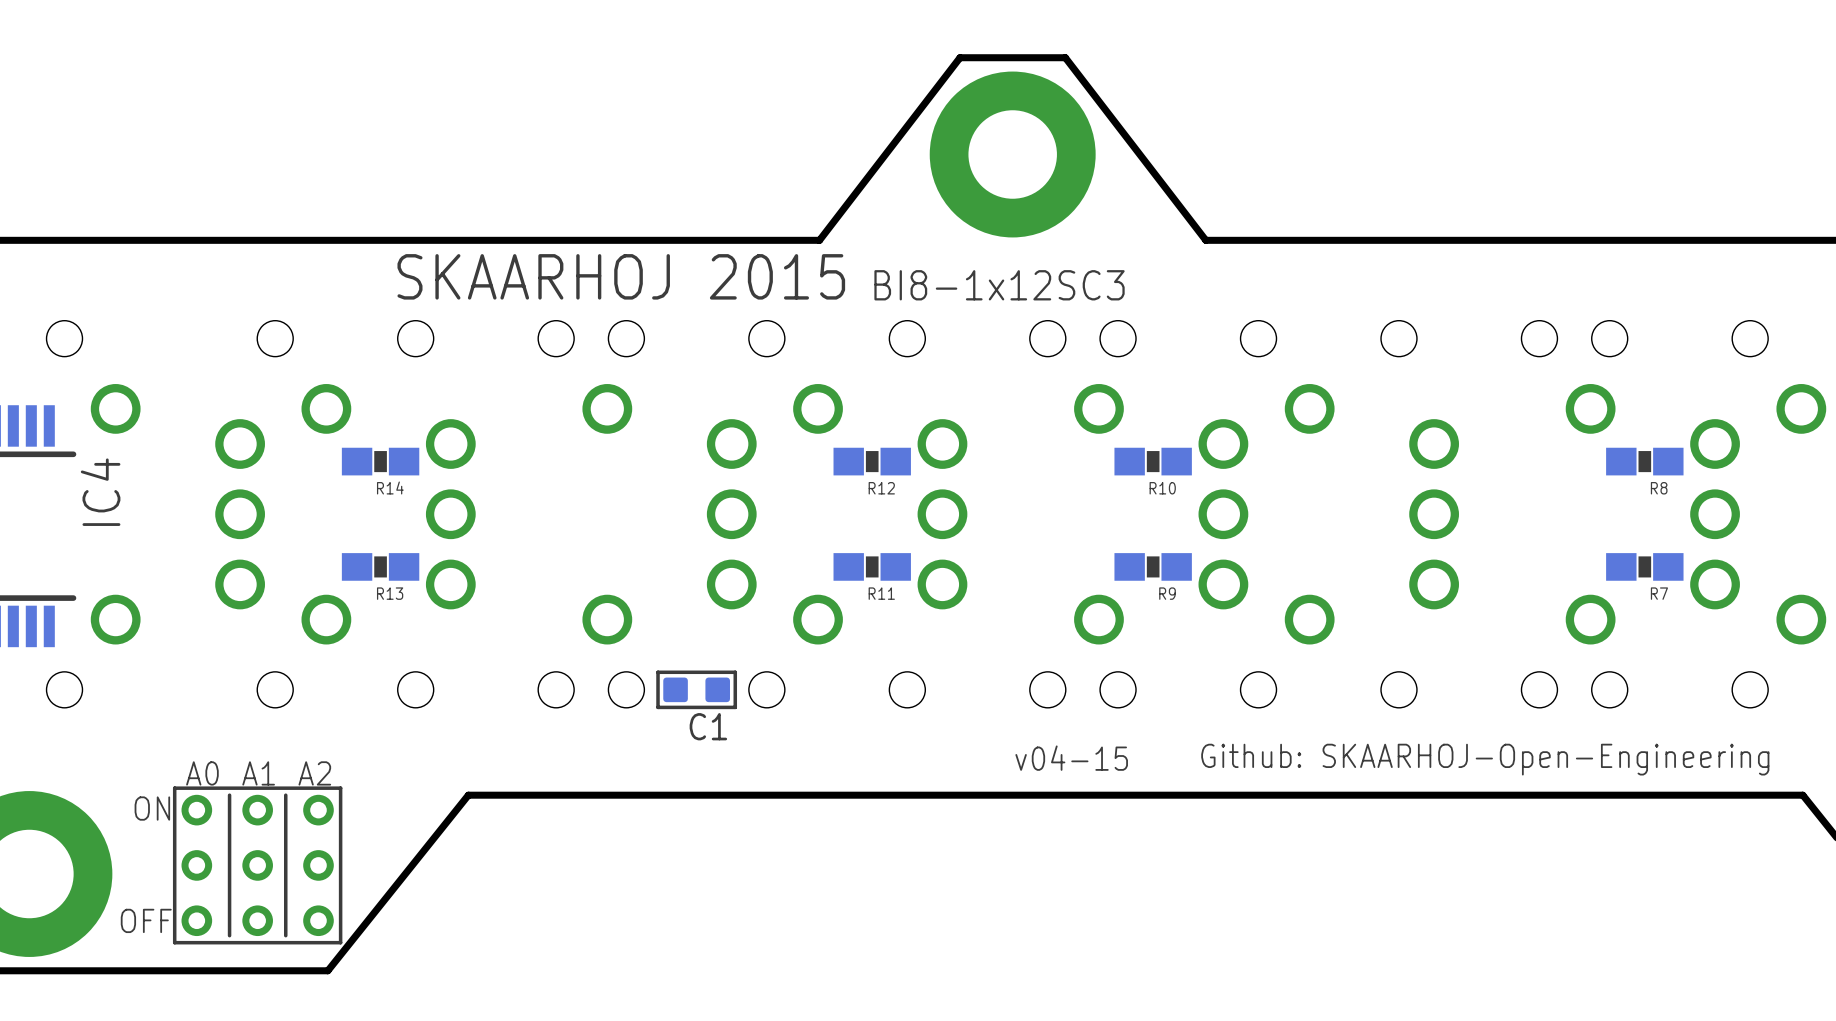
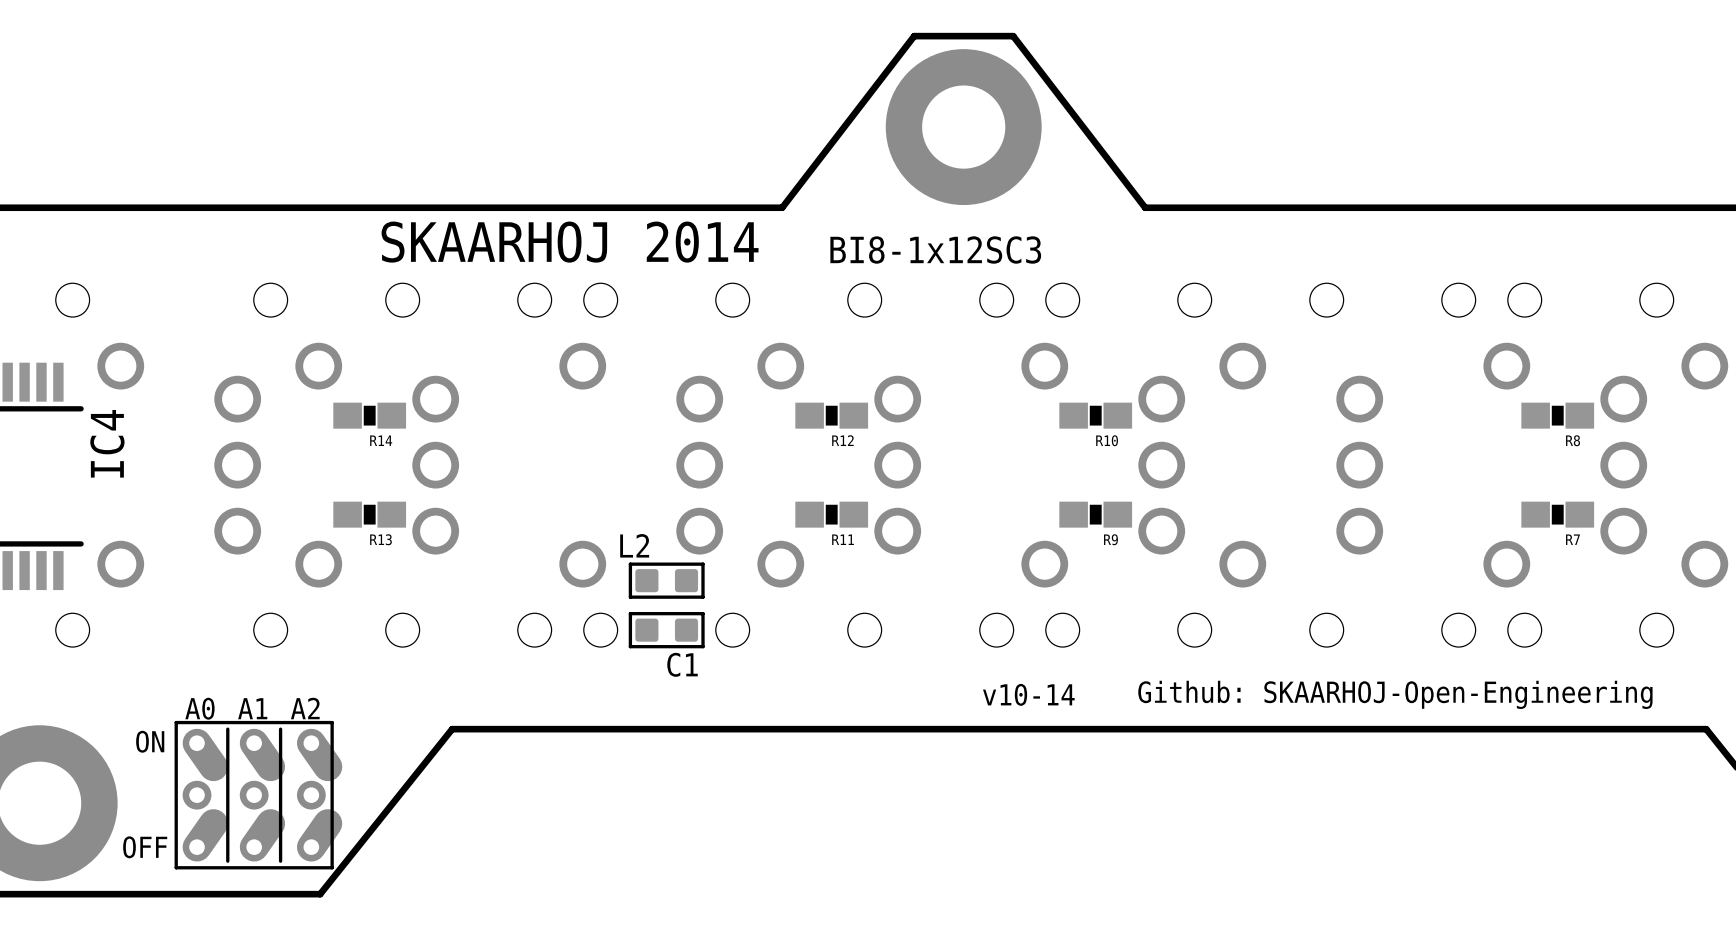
text: SKAARHOJ 2015 (621, 276) -> SKAARHOJ 2014 (570, 242)
L2: none -> (666, 580)
text: v04-15 (1071, 758) -> v10-14 (1028, 694)
part footprint: [172, 786, 343, 945] -> [174, 720, 343, 870]

